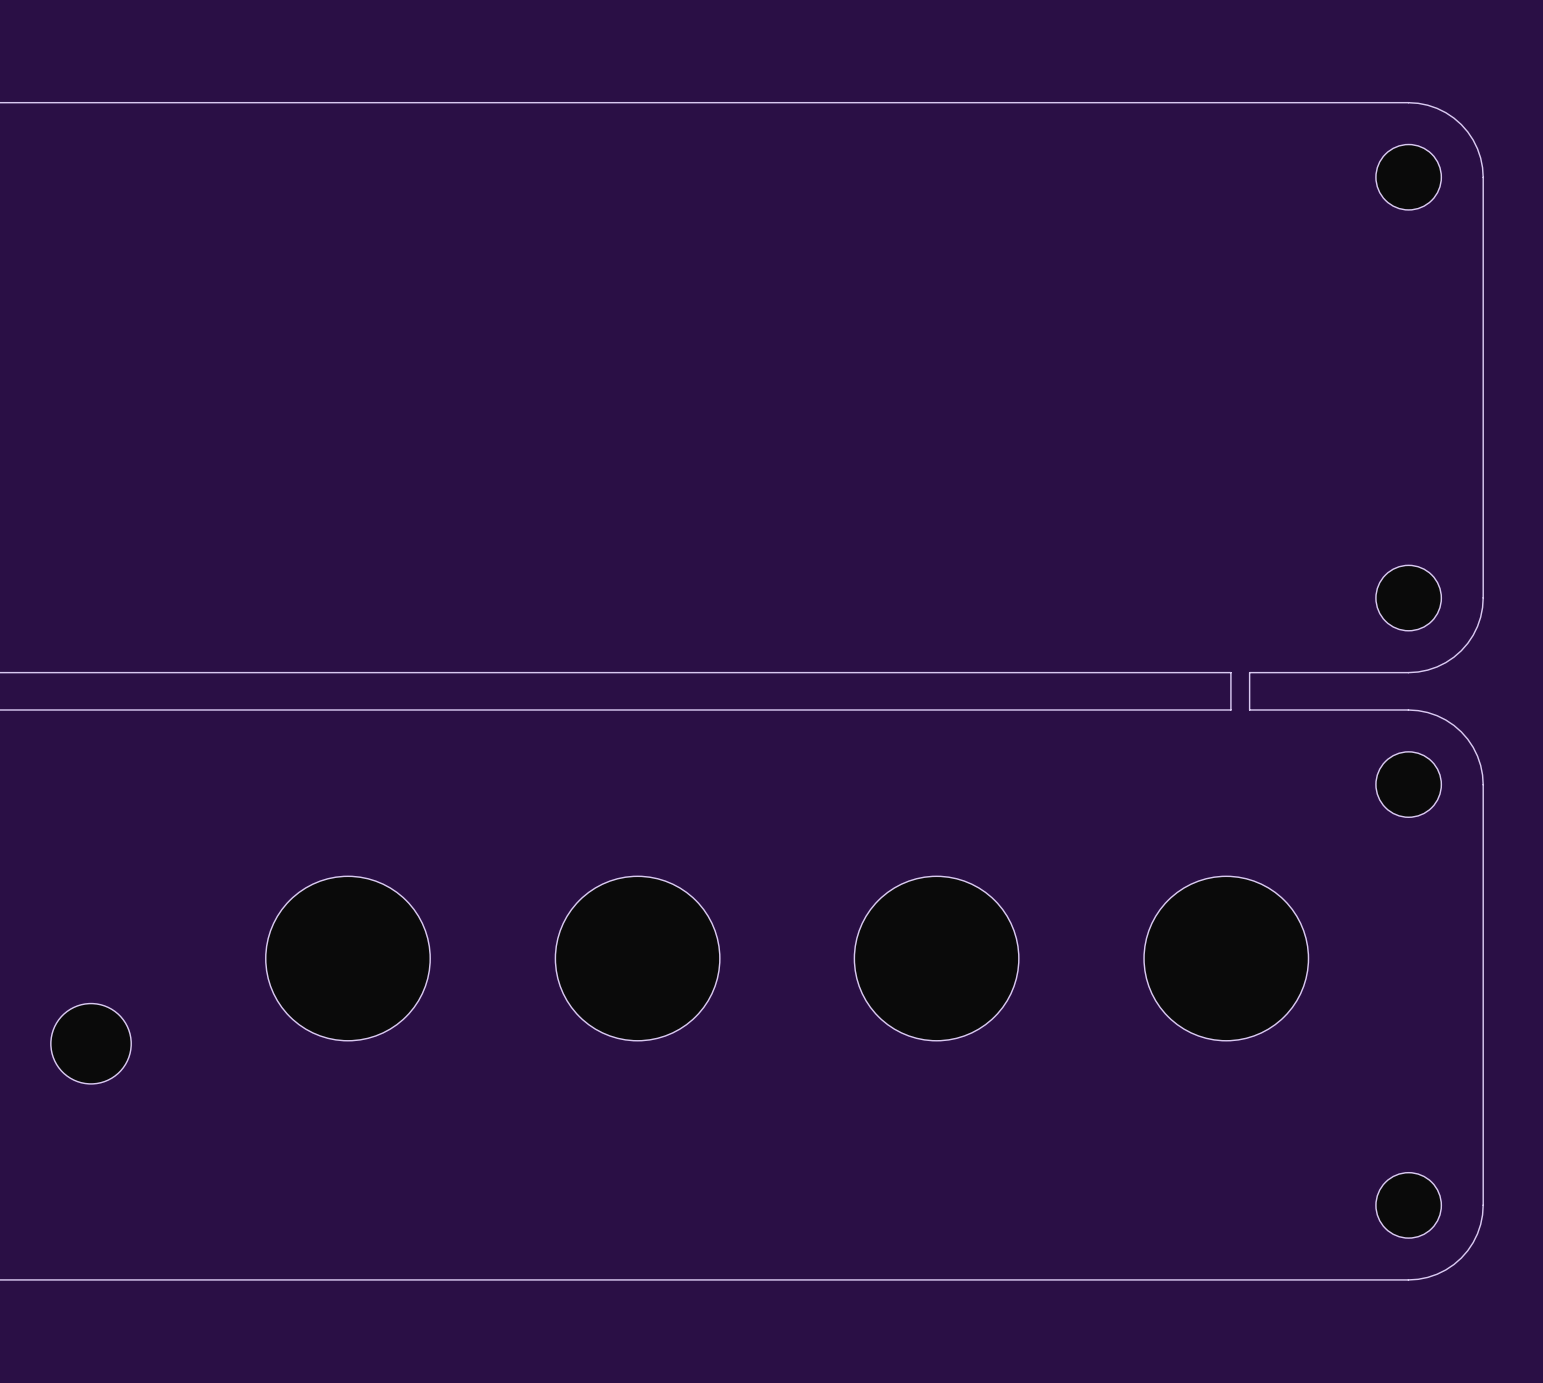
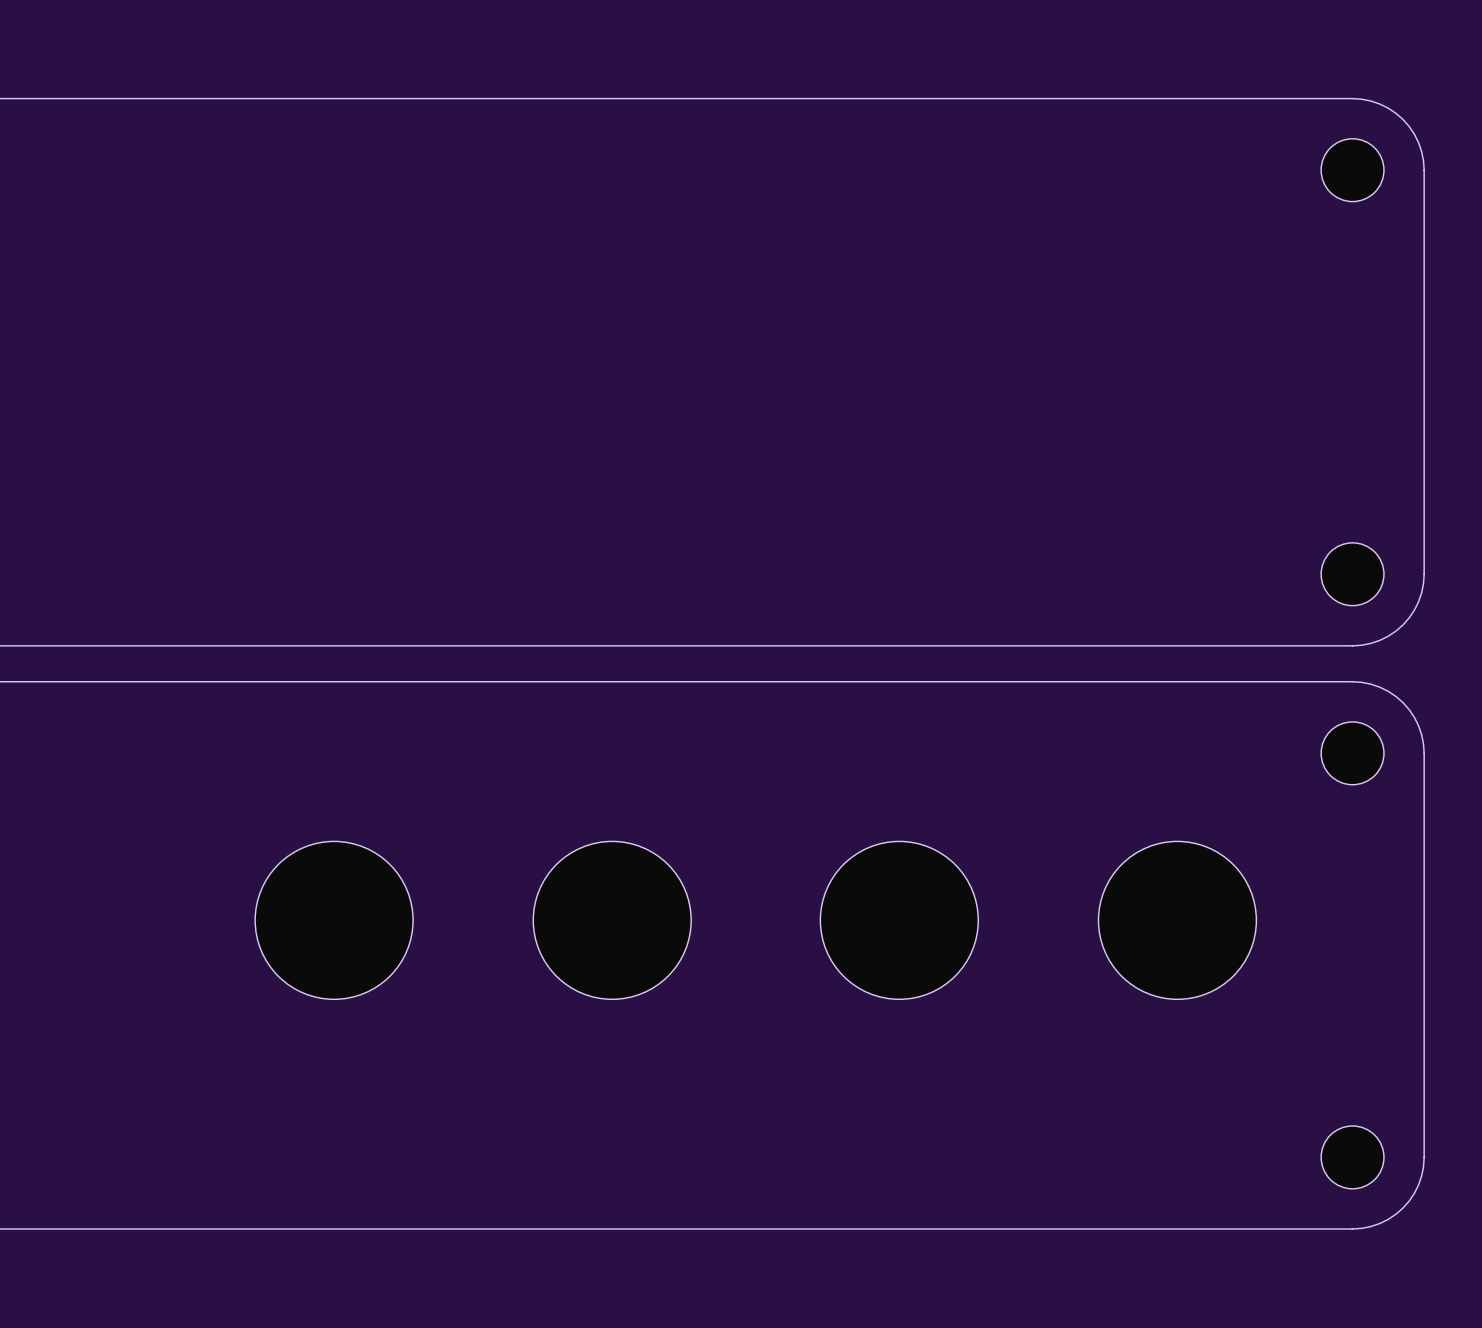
board edge: (1230, 672) (1230, 710) -> (1199, 681) (1181, 681)
board edge: (1249, 672) (1249, 710) -> (1199, 645) (1181, 645)
part: (91, 1043) -> none

